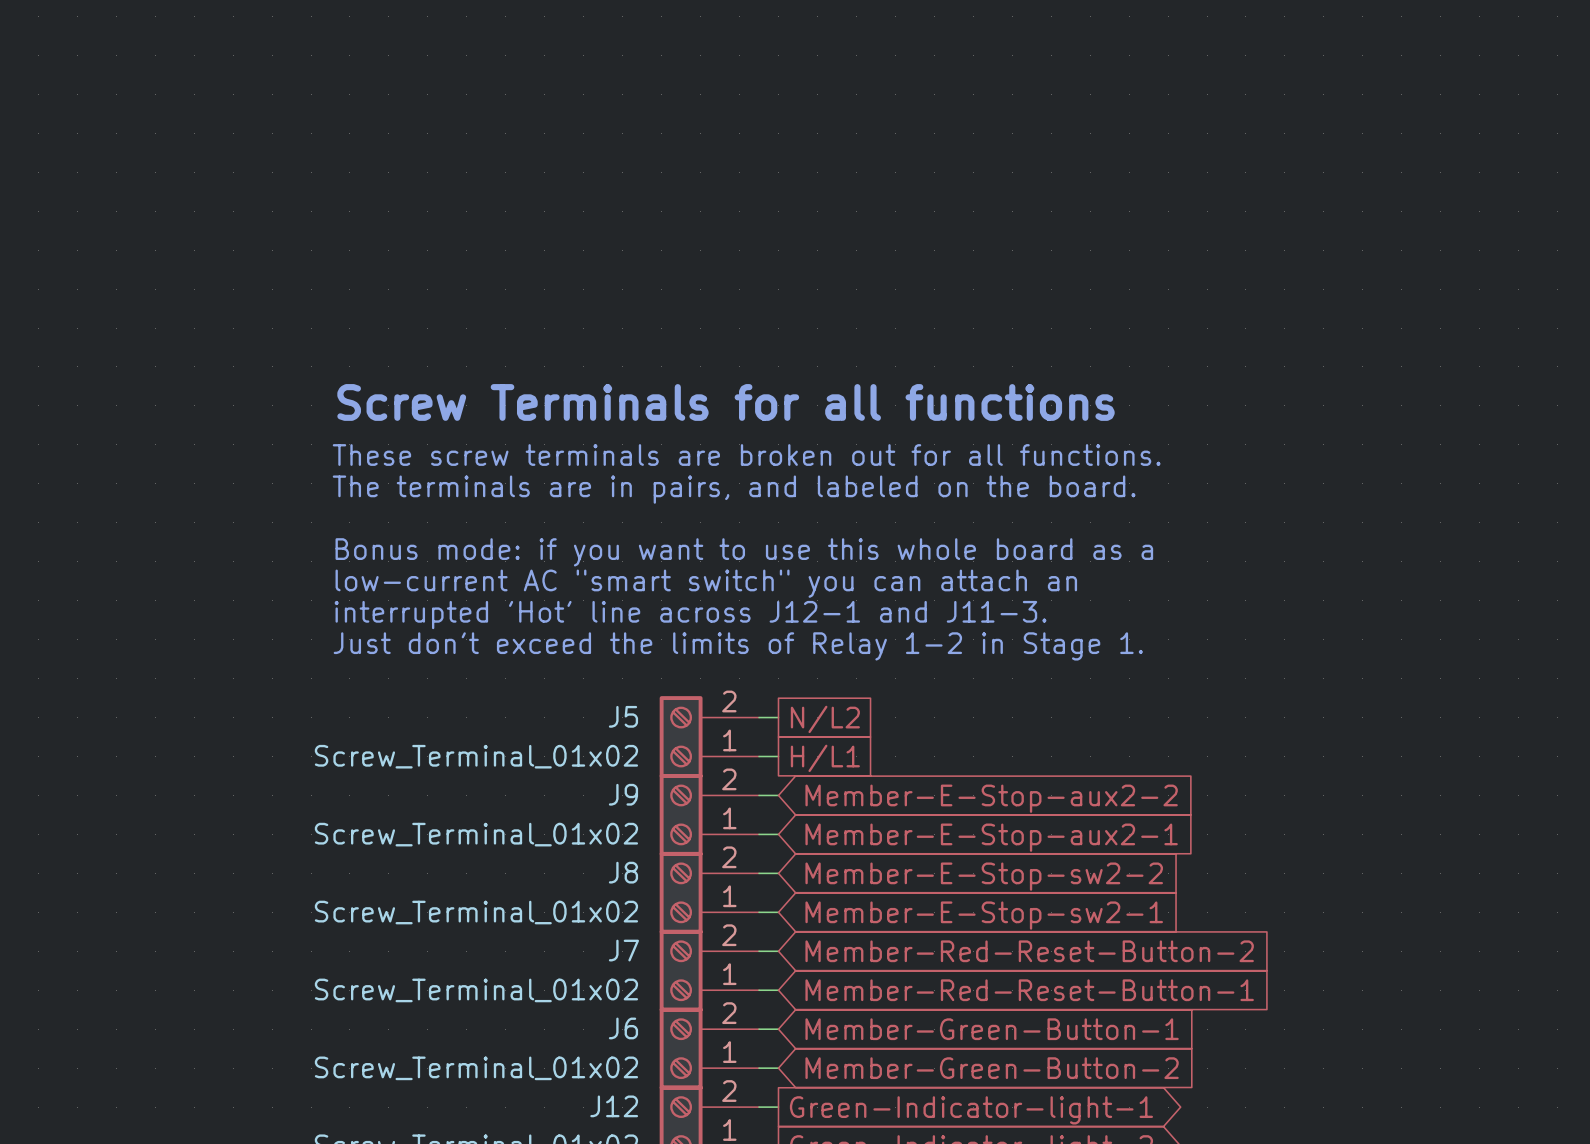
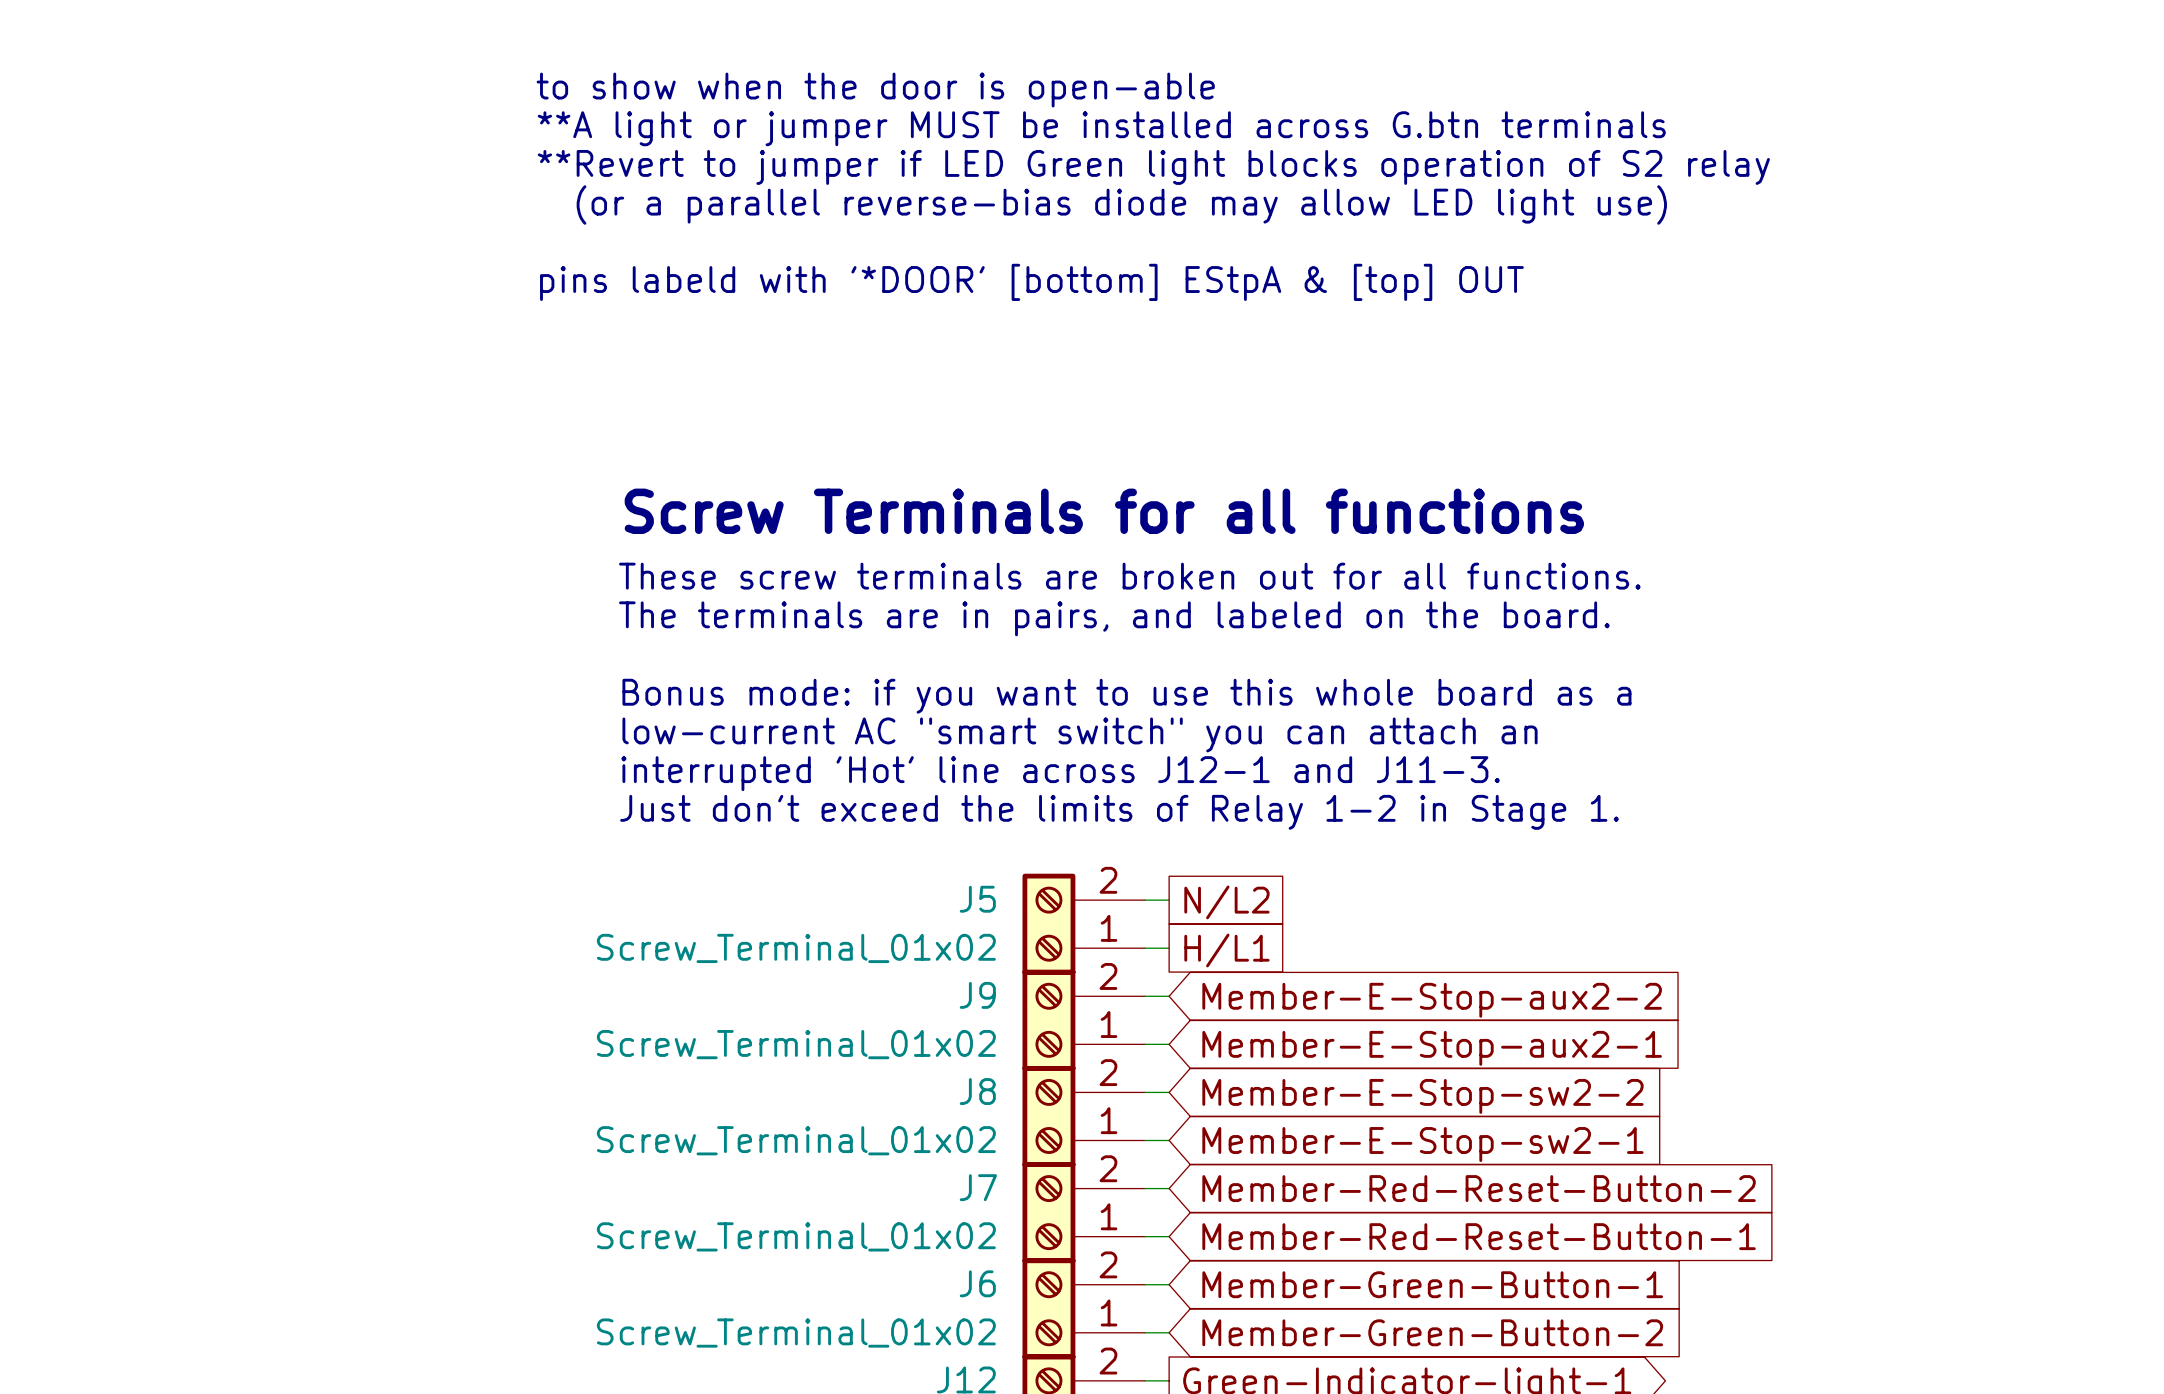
text: none -> to show when the door is open-able (875, 90)
text: none -> **A light or jumper MUST be installed across G.btn terminals (1101, 128)
text: none -> **Revert to jumper if LED Green light blocks operation of S2 relay (1153, 167)
text: none -> (or a parallel reverse-bias diode may allow LED light use) (1121, 204)
text: none -> pins labeld with '*DOOR' [bottom] EStpA & [top] OUT (1031, 282)

